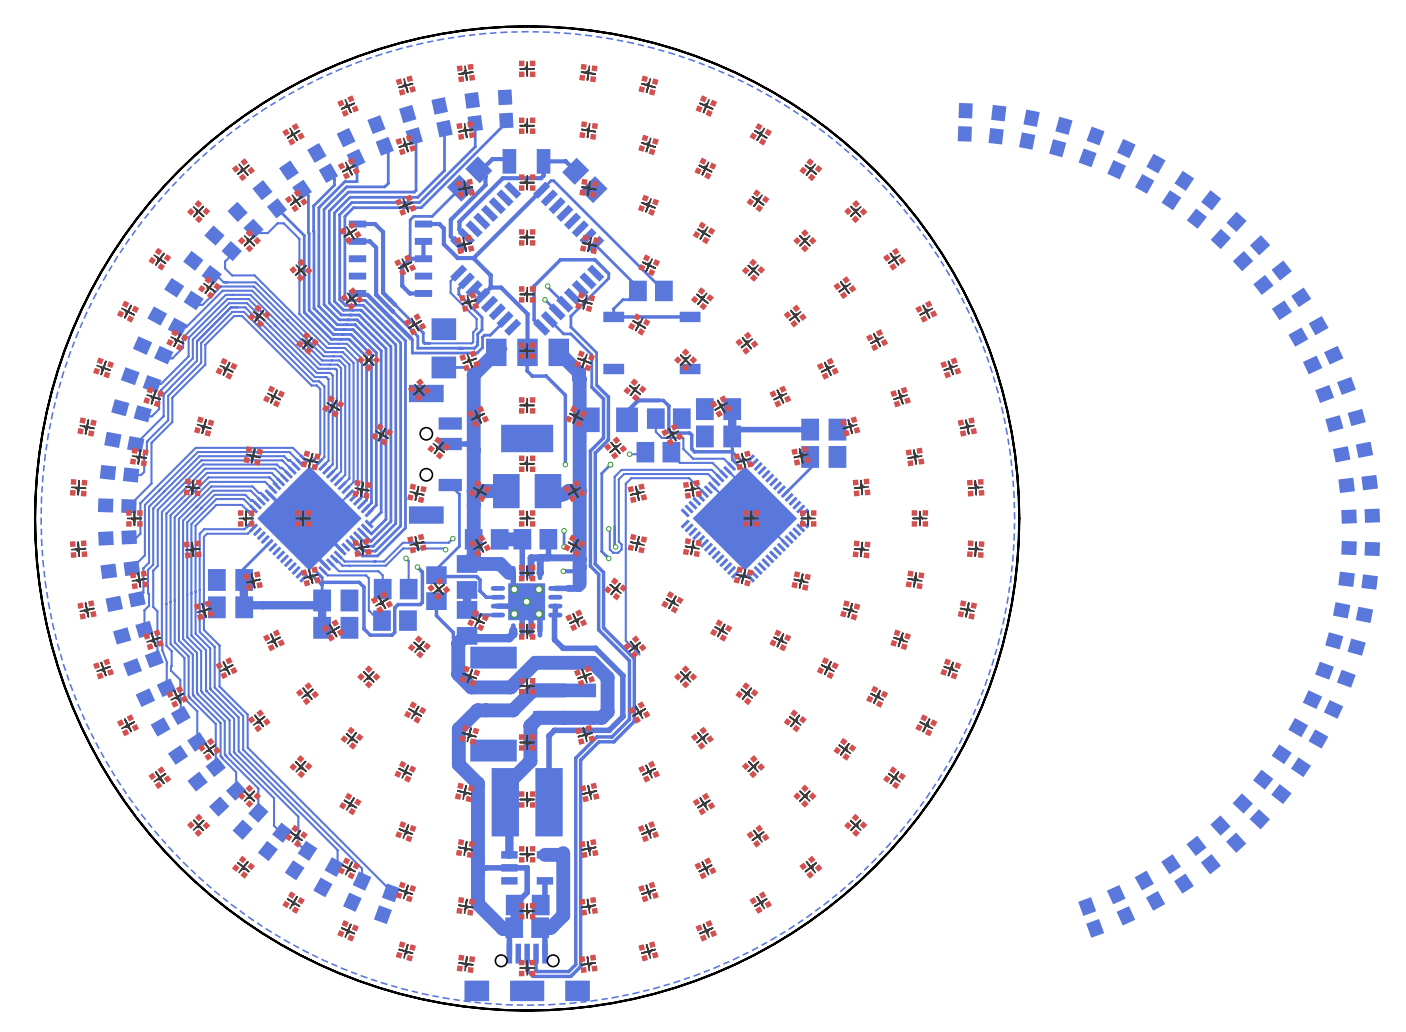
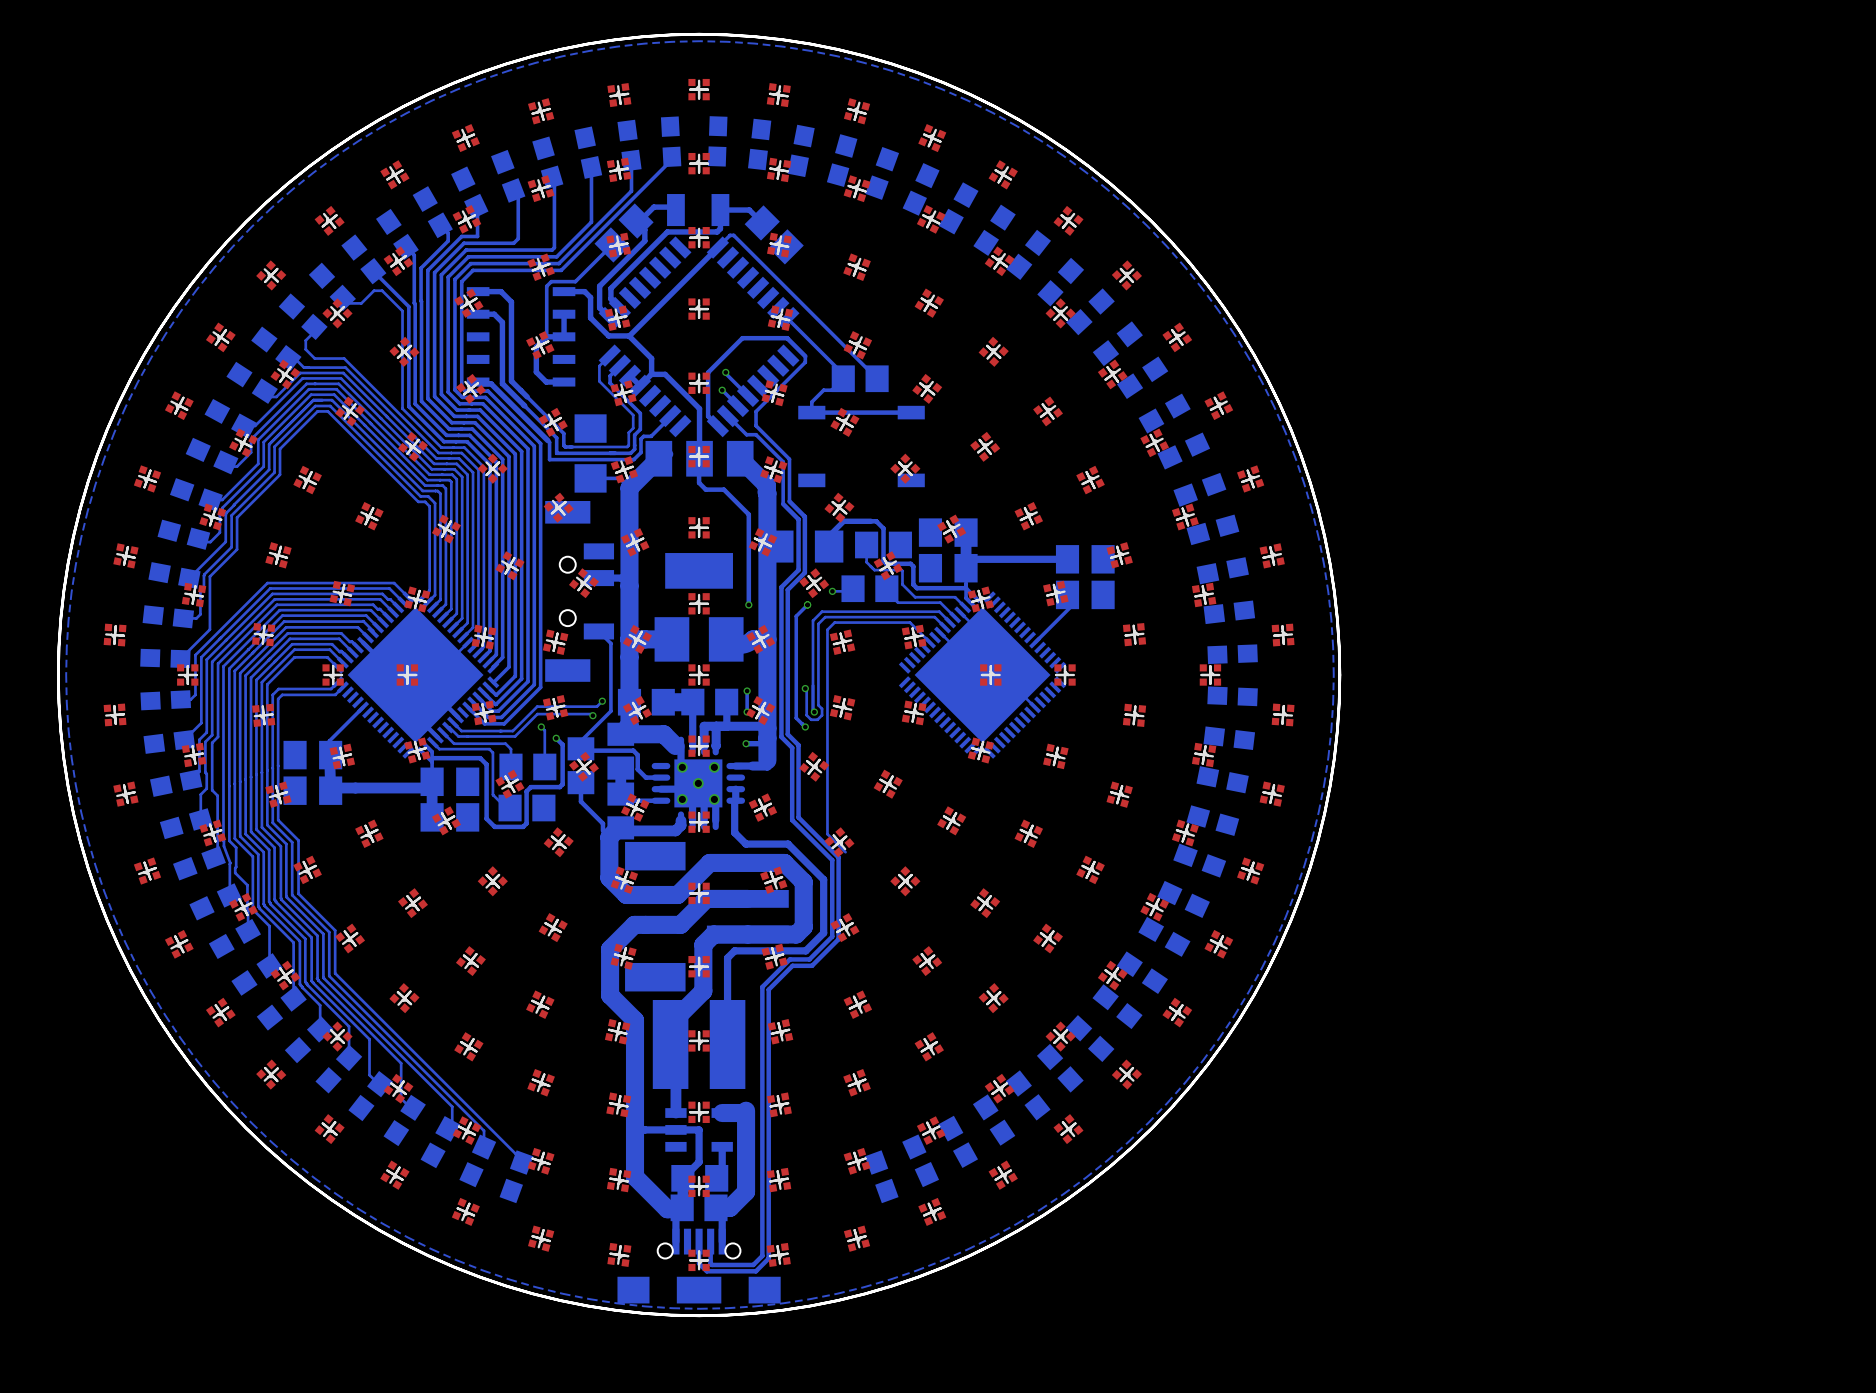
part: none -> (717, 141)
part: none -> (759, 144)
part: none -> (801, 150)
part: (965, 122) -> none
part: none -> (842, 160)
part: (997, 124) -> none
part: (1029, 129) -> none
part: none -> (882, 173)
part: (1060, 137) -> none
part: none -> (921, 189)
part: (1091, 146) -> none
part: (1121, 159) -> none
part: none -> (958, 208)
part: (1150, 173) -> none
part: none -> (994, 230)
part: (1177, 190) -> none
part: none -> (1028, 254)
part: (1204, 209) -> none
part: none -> (1060, 282)
part: (1228, 230) -> none
part: none -> (1090, 311)
part: (1251, 253) -> none
part: none -> (1117, 343)
part: (1272, 277) -> none
part: none -> (1142, 377)
part: (1291, 303) -> none
part: none -> (1164, 413)
part: (1308, 331) -> none
part: none -> (1183, 451)
part: (1323, 360) -> none
part: none -> (1199, 489)
part: (1335, 389) -> none
part: none -> (1212, 529)
part: (1345, 420) -> none
part: none -> (1222, 570)
part: (1353, 452) -> none
part: none -> (1229, 612)
part: (1358, 483) -> none
part: none -> (1232, 654)
part: (1360, 516) -> none
part: none -> (1232, 696)
part: (1360, 548) -> none
part: none -> (1229, 738)
part: (1358, 580) -> none
part: none -> (1222, 779)
part: (1353, 612) -> none
part: none -> (1212, 820)
part: (1345, 643) -> none
part: none -> (1199, 860)
part: (1335, 674) -> none
part: none -> (1183, 899)
part: (1323, 704) -> none
part: none -> (1164, 936)
part: (1308, 733) -> none
part: none -> (1142, 972)
part: (1291, 760) -> none
part: none -> (1117, 1006)
part: (1272, 786) -> none
part: none -> (1090, 1038)
part: (1251, 811) -> none
part: none -> (1060, 1068)
part: (1228, 834) -> none
part: none -> (1028, 1095)
part: (1203, 855) -> none
part: none -> (994, 1120)
part: (1177, 873) -> none
part: none -> (958, 1141)
part: (1149, 890) -> none
part: none -> (920, 1160)
part: none -> (881, 1176)
part: (1121, 905) -> none
part: (1091, 917) -> none

